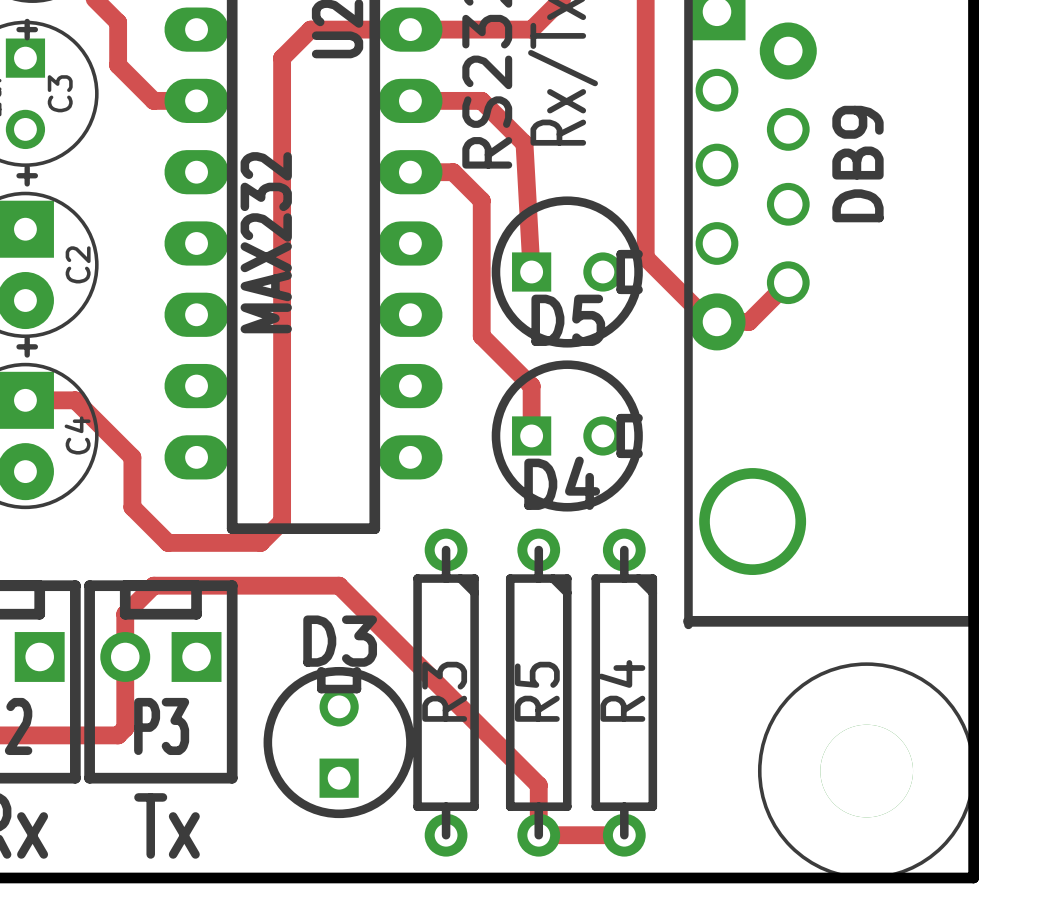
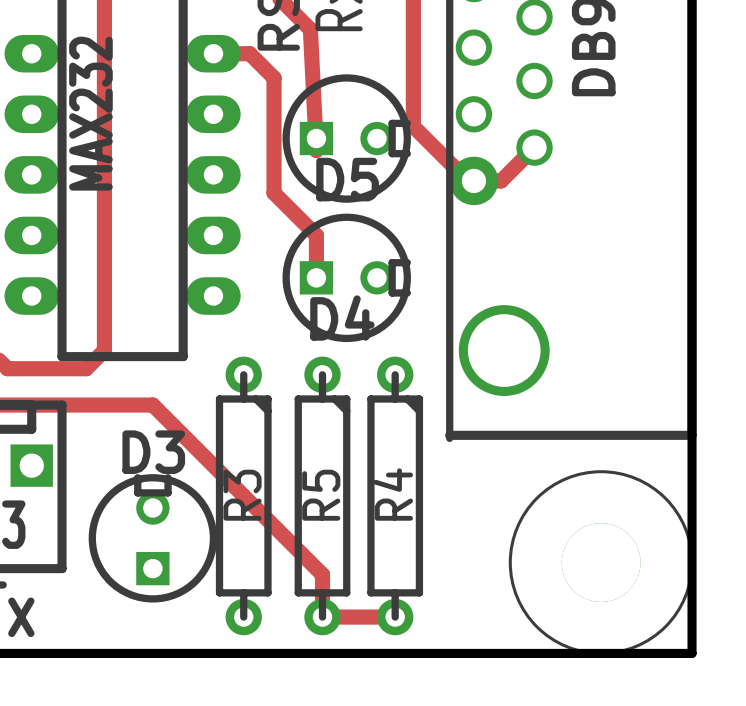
track: (524, 143) (531, 272) -> (310, 29) (316, 150)

